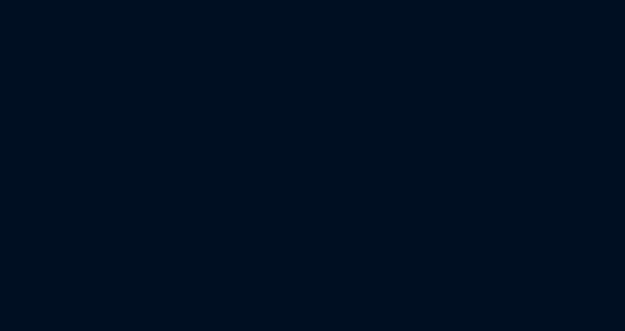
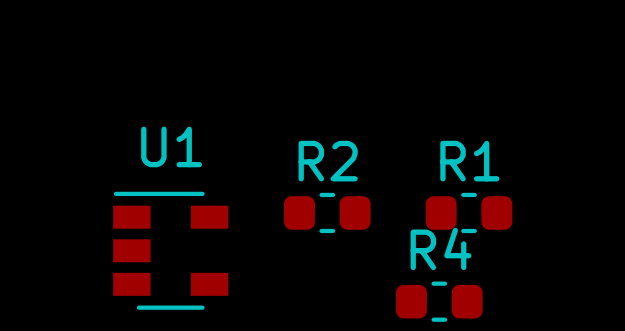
R2: none -> (327, 212)
R1: none -> (469, 212)
U1: none -> (170, 250)
R4: none -> (439, 301)

